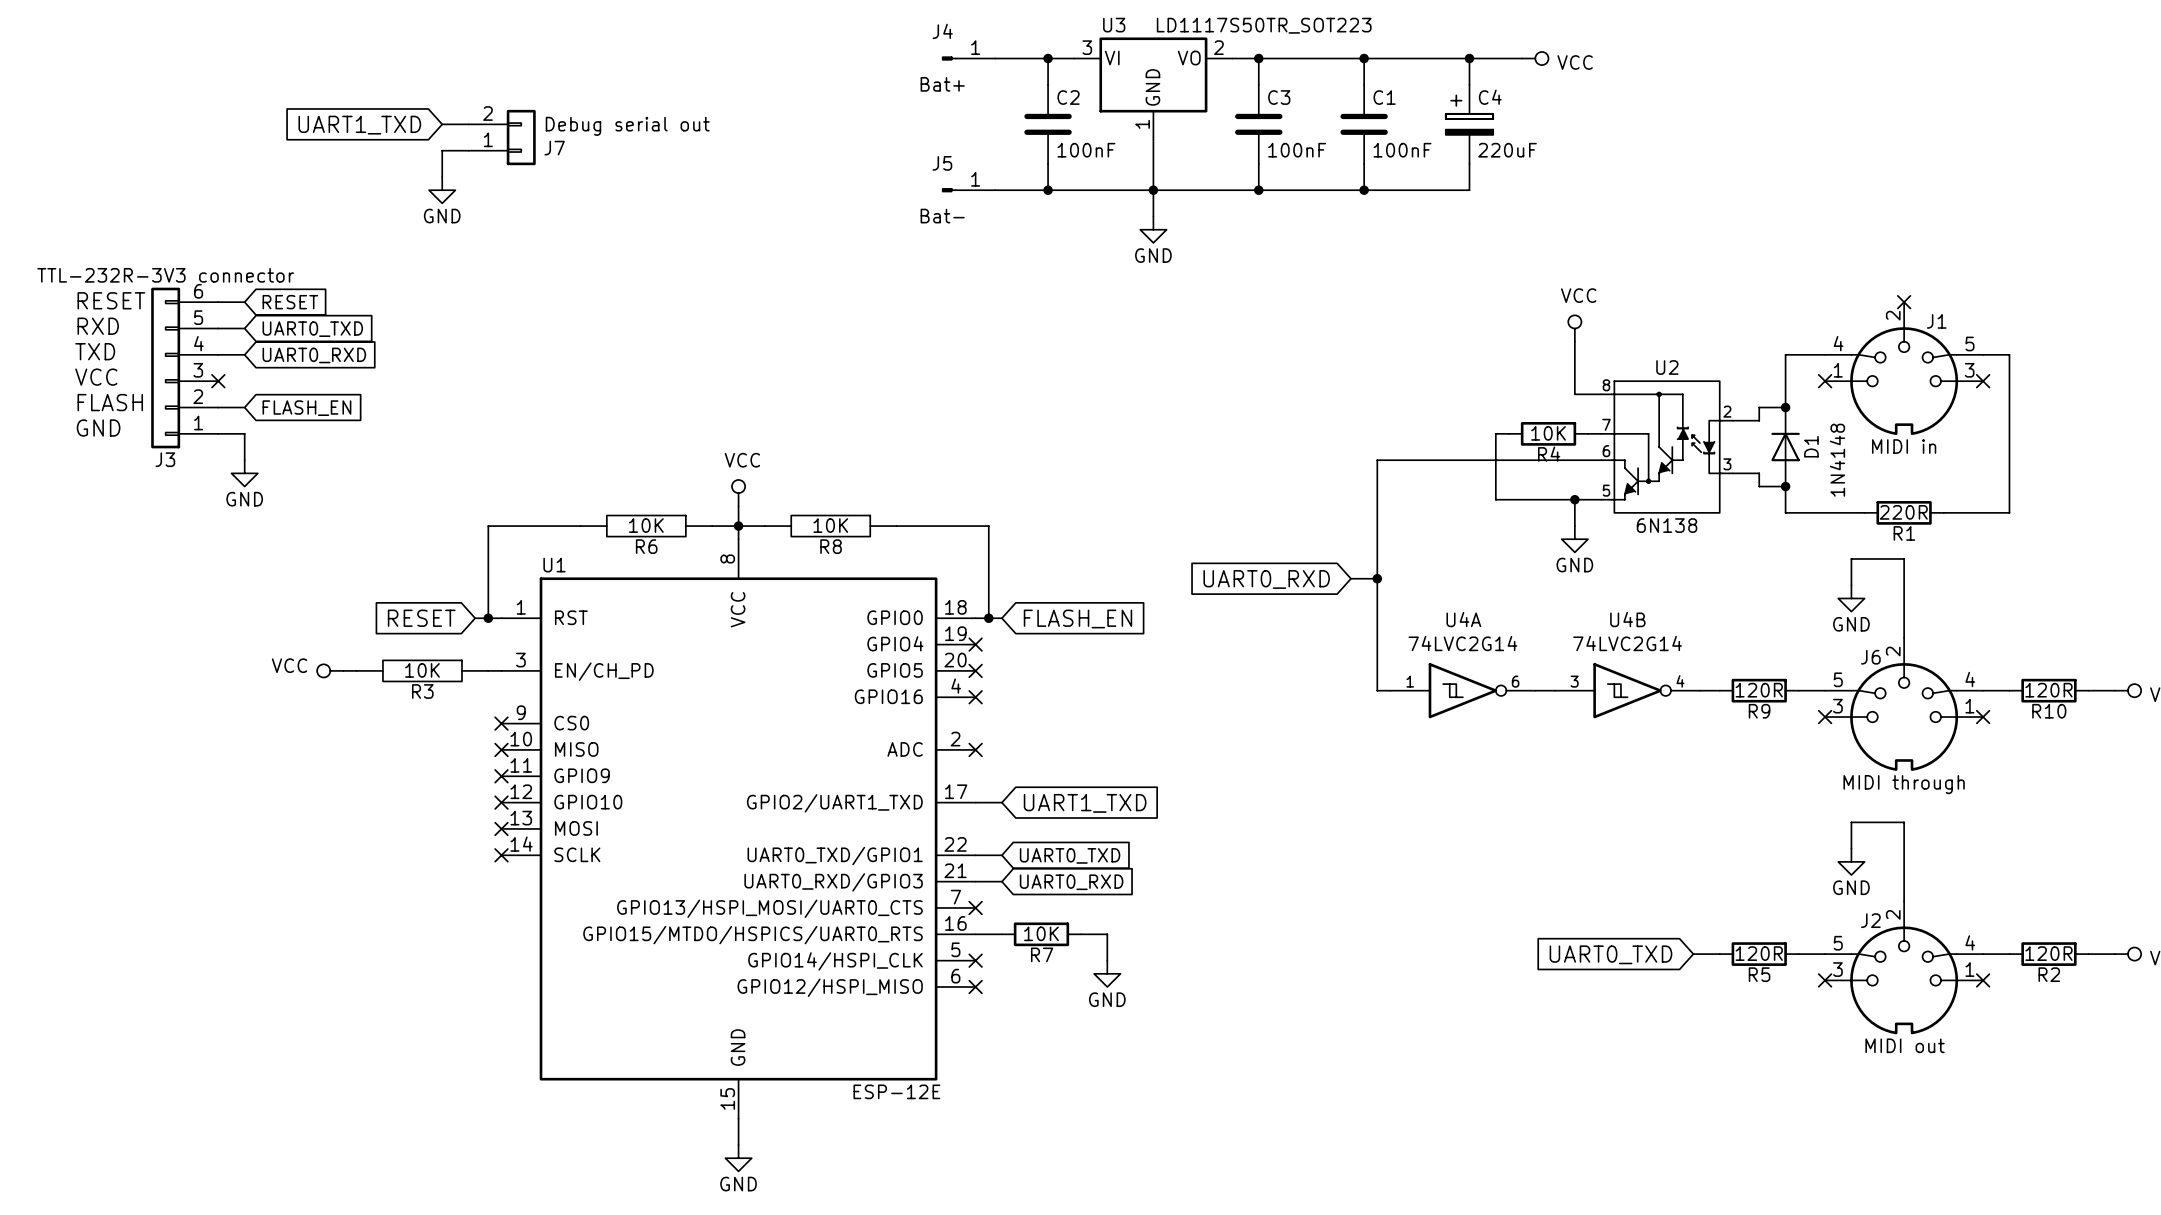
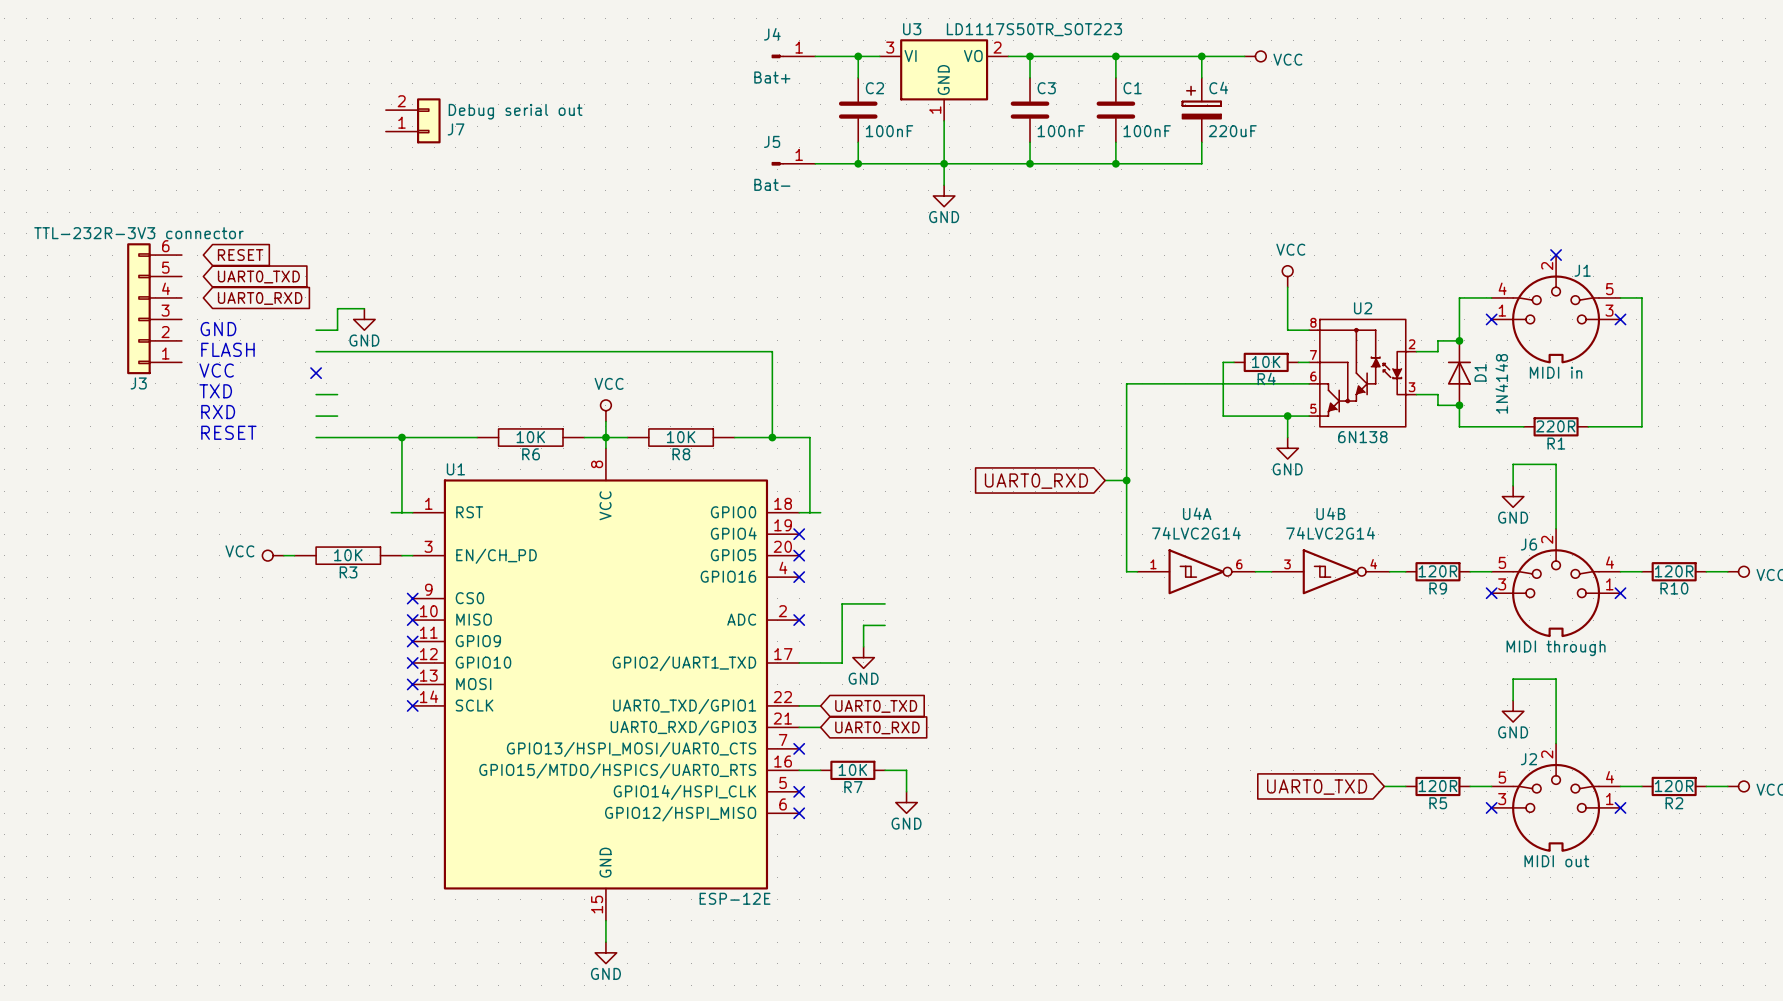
wire: (442, 124) (468, 124) -> none
global label: UART1_TXD (359, 125) -> none
wire: (468, 150) (442, 150) (442, 177) -> none
power symbol: GND (442, 190) -> none
text: RESET (111, 300) -> none
wire: (218, 302) (244, 302) -> none
text position: RXD (98, 326) -> RXD (218, 412)
wire: (218, 328) (244, 328) -> (316, 394) (337, 394)
text position: TXD (95, 351) -> TXD (215, 391)
wire: (218, 354) (244, 354) -> (316, 416) (337, 416)
wire: none -> (364, 308) (337, 308) (337, 330) (316, 330)
text position: VCC (96, 377) -> VCC (216, 370)
no-connect mark: (218, 381) -> none
power symbol: none -> GND (364, 319)
text position: FLASH (110, 402) -> FLASH (227, 349)
wire: (218, 407) (244, 407) -> none
global label: FLASH_EN (306, 408) -> none
wire: none -> (316, 351) (772, 351) (772, 437)
text position: GND (98, 428) -> GND (218, 329)
wire: (218, 433) (244, 433) (244, 460) -> none
no-connect mark: none -> (316, 373)
power symbol: GND (244, 473) -> none
text: none -> RESET (228, 432)
wire: none -> (316, 437) (401, 437)
junction: none -> (401, 437)
junction: none -> (772, 437)
global label: RESET (421, 618) -> none
junction: (488, 618) -> none
junction: (988, 618) -> none
global label: FLASH_EN (1077, 618) -> none
wire: none -> (885, 603) (842, 603) (842, 662) (820, 662)
wire: none -> (885, 625) (863, 625) (863, 646)
power symbol: none -> GND (863, 657)
global label: UART1_TXD (1085, 803) -> none

